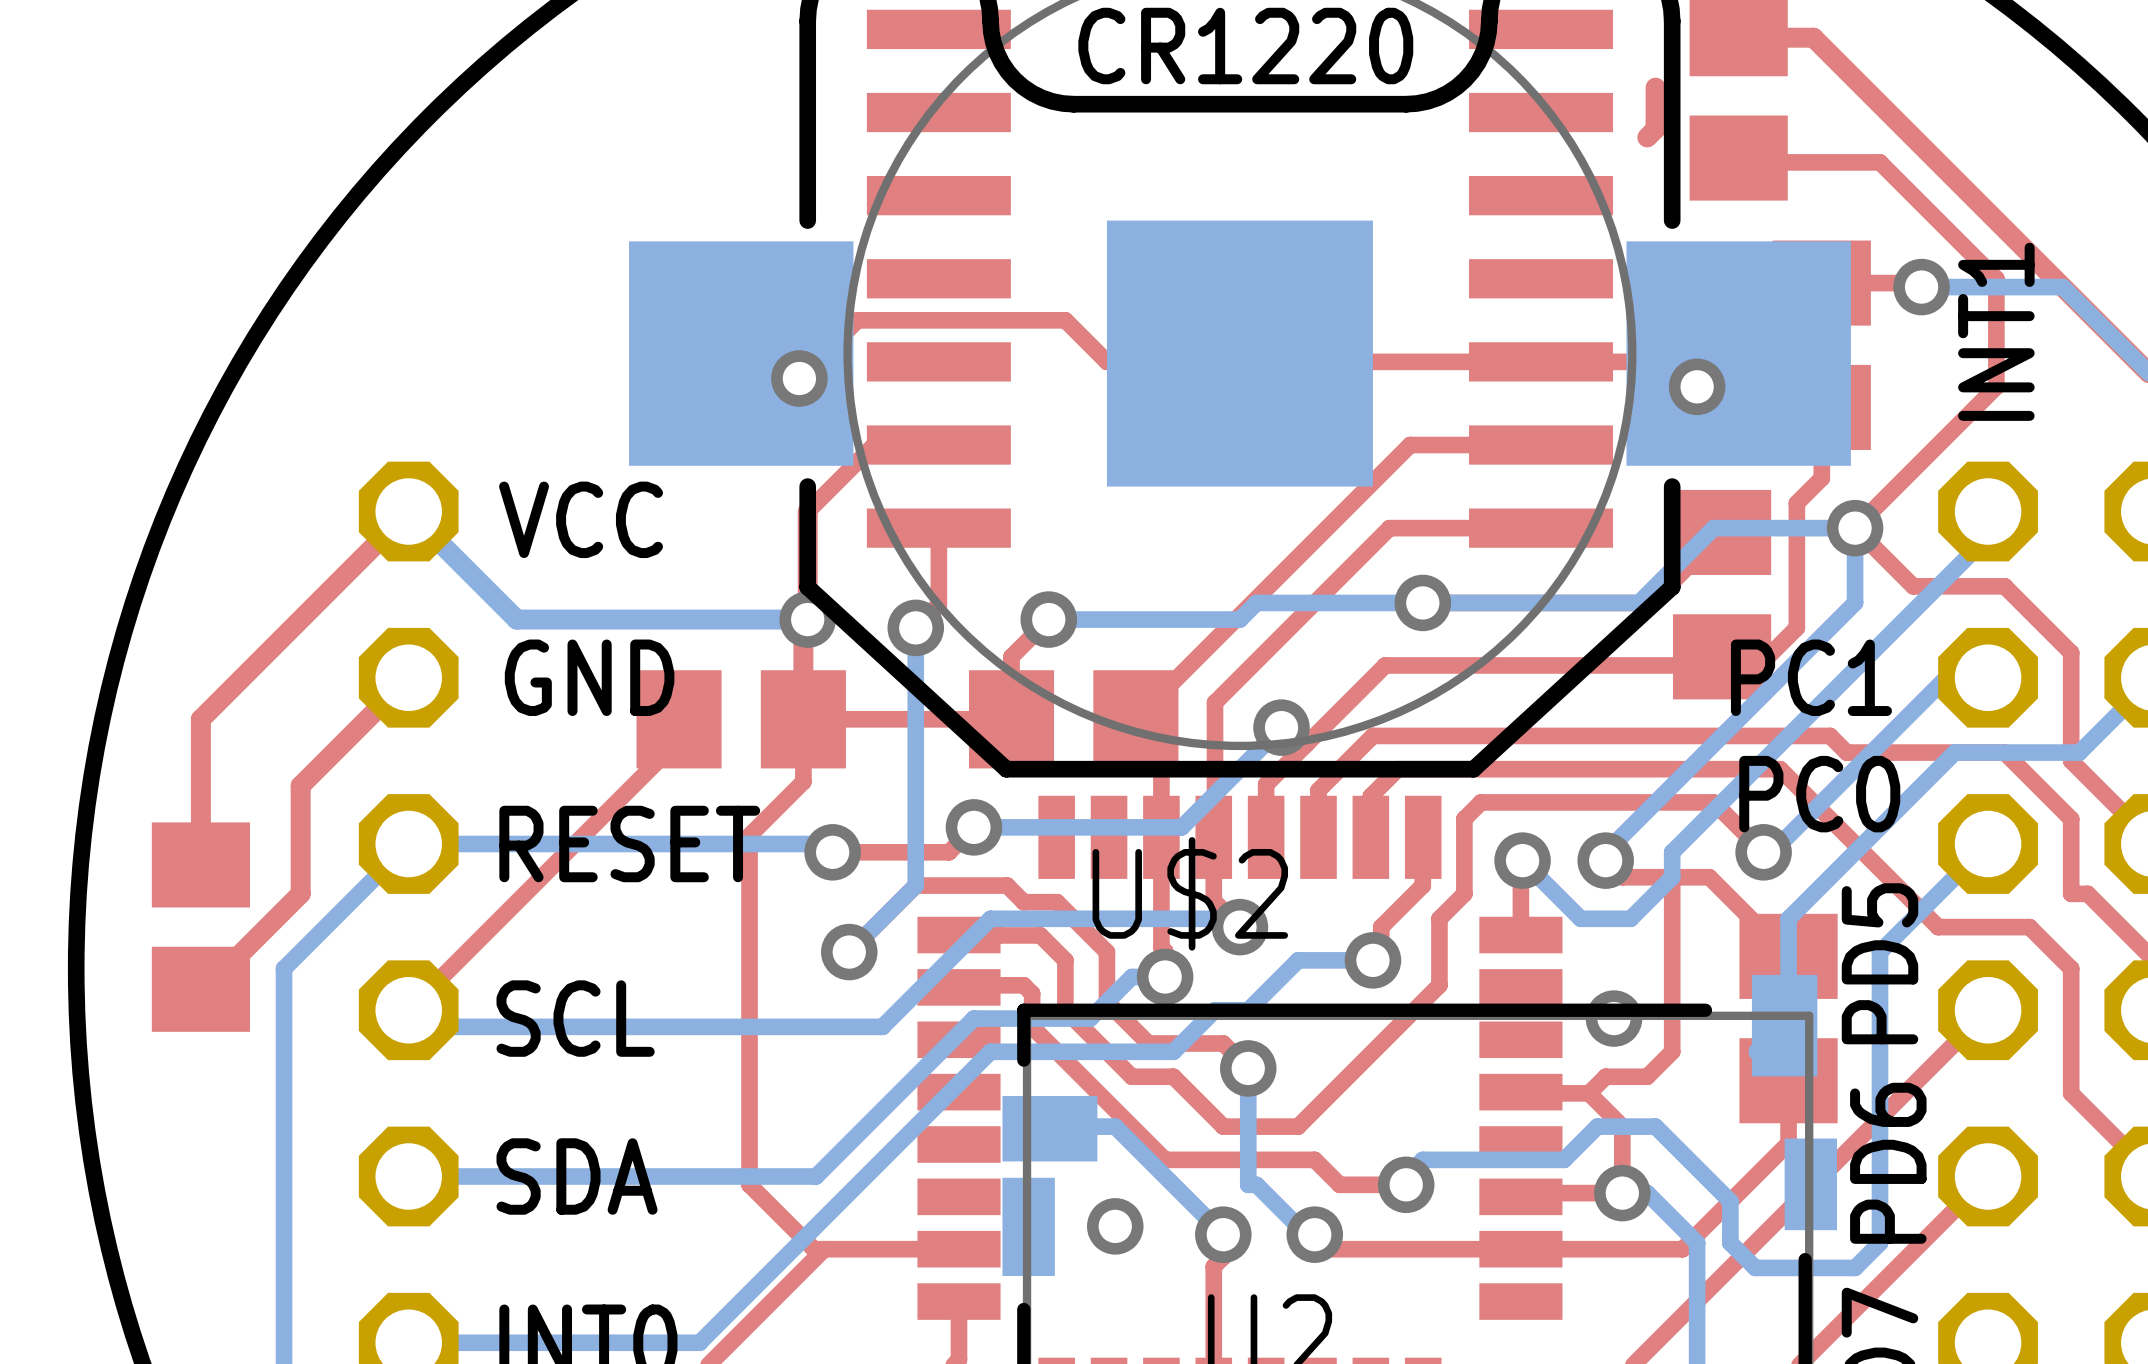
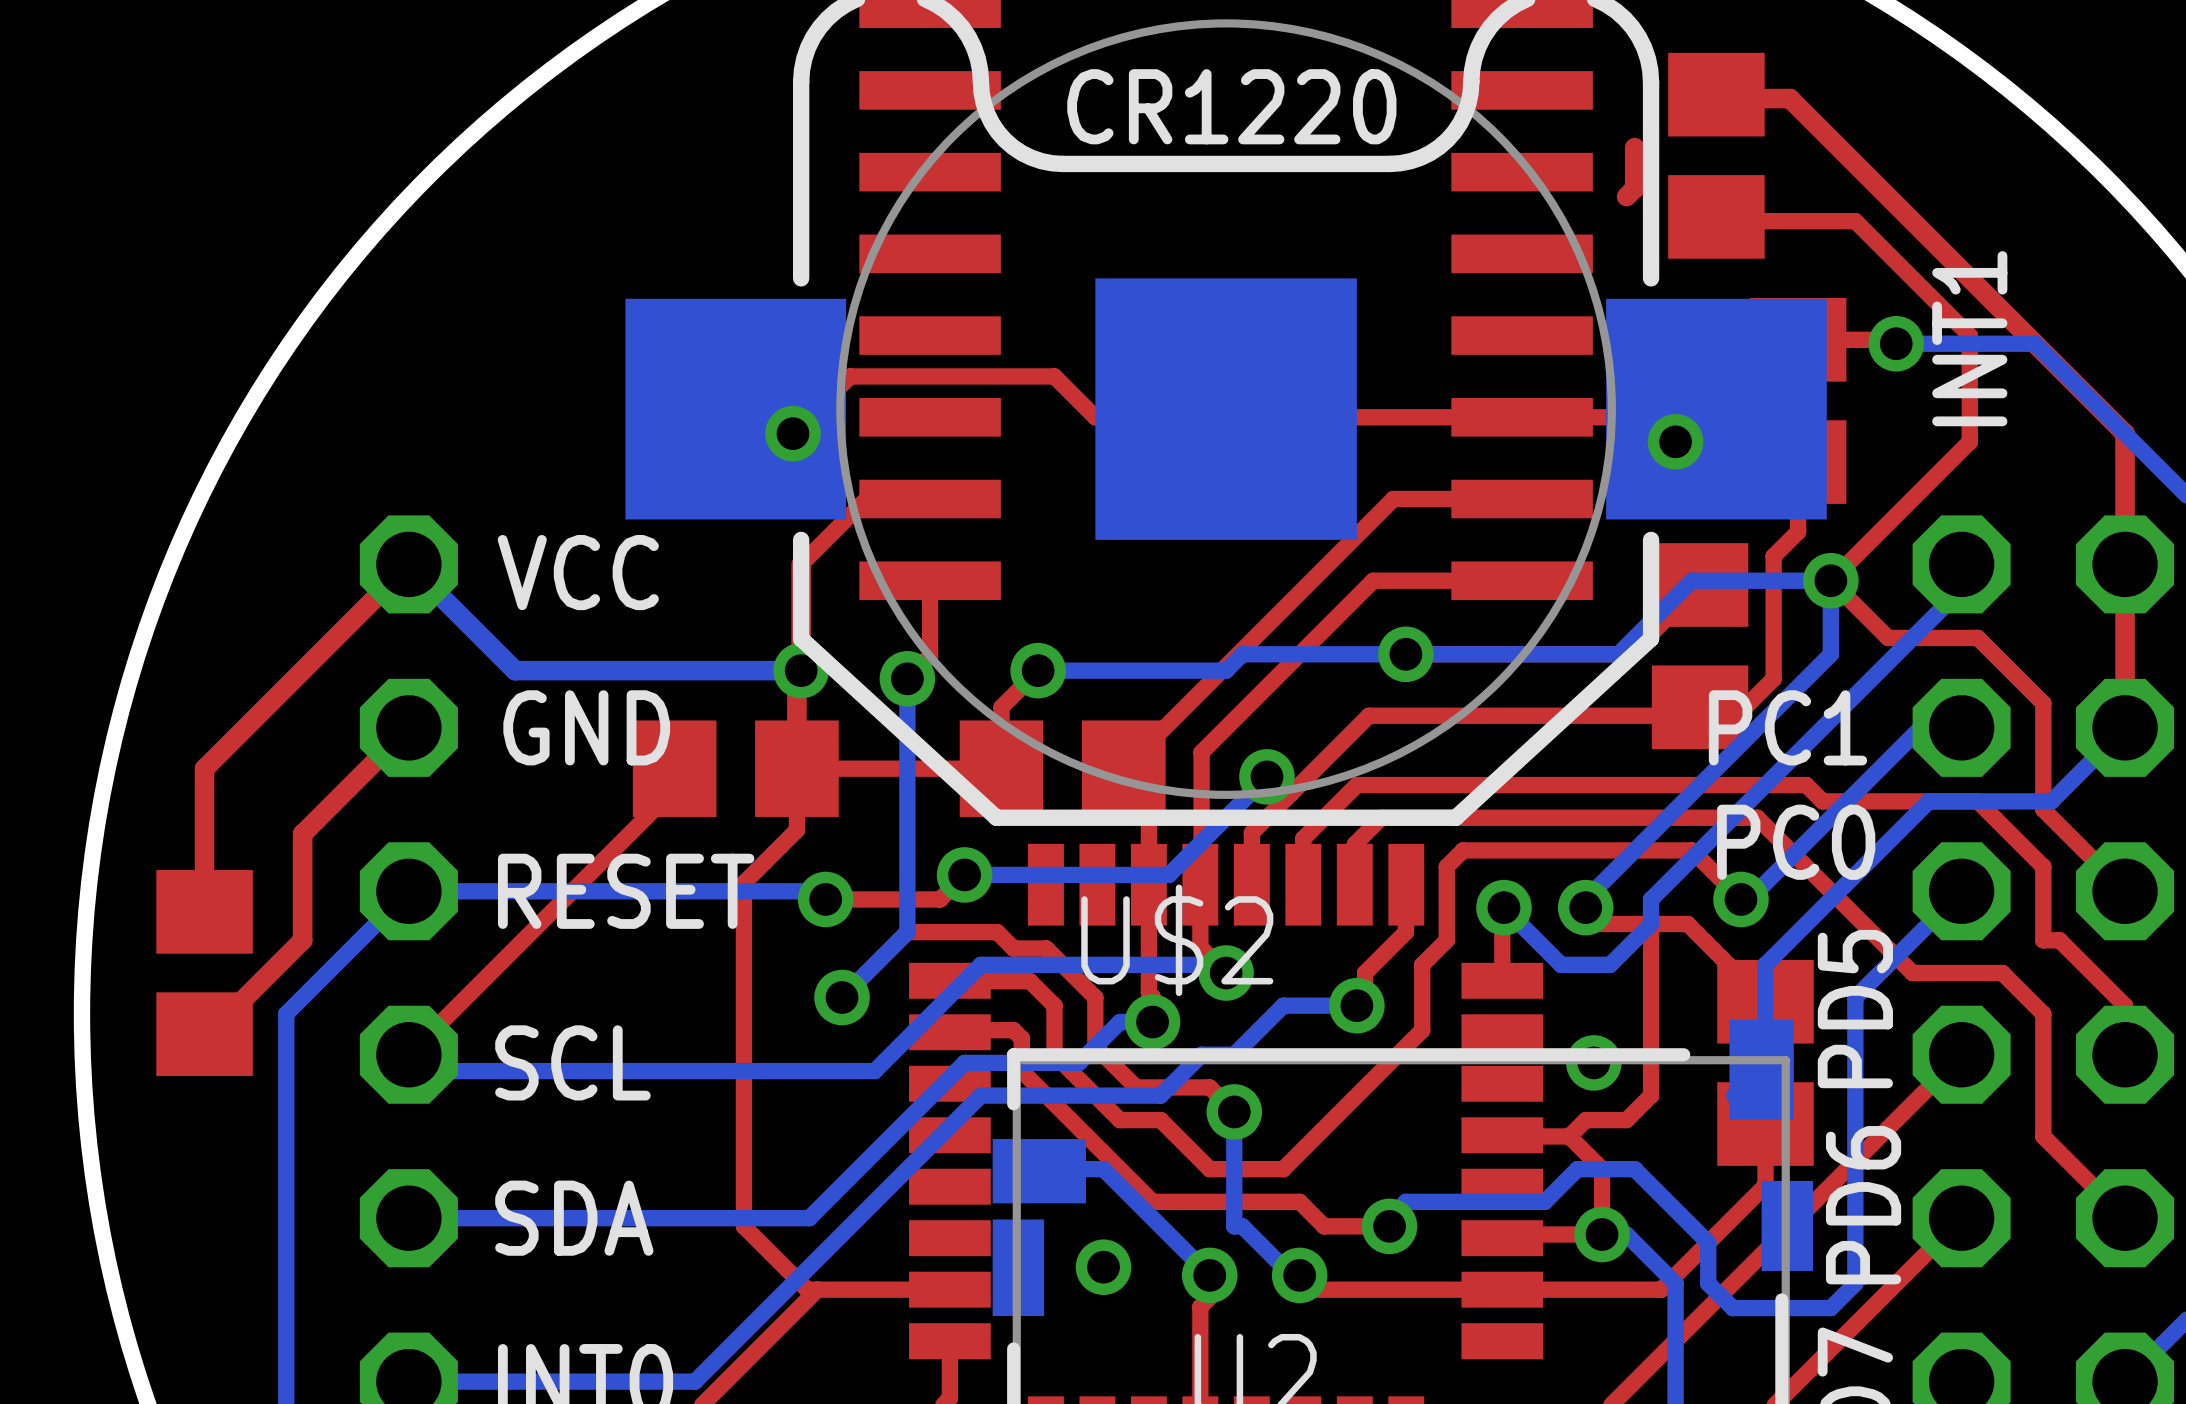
text position: INT1 (1996, 331) -> INT1 (1969, 338)

